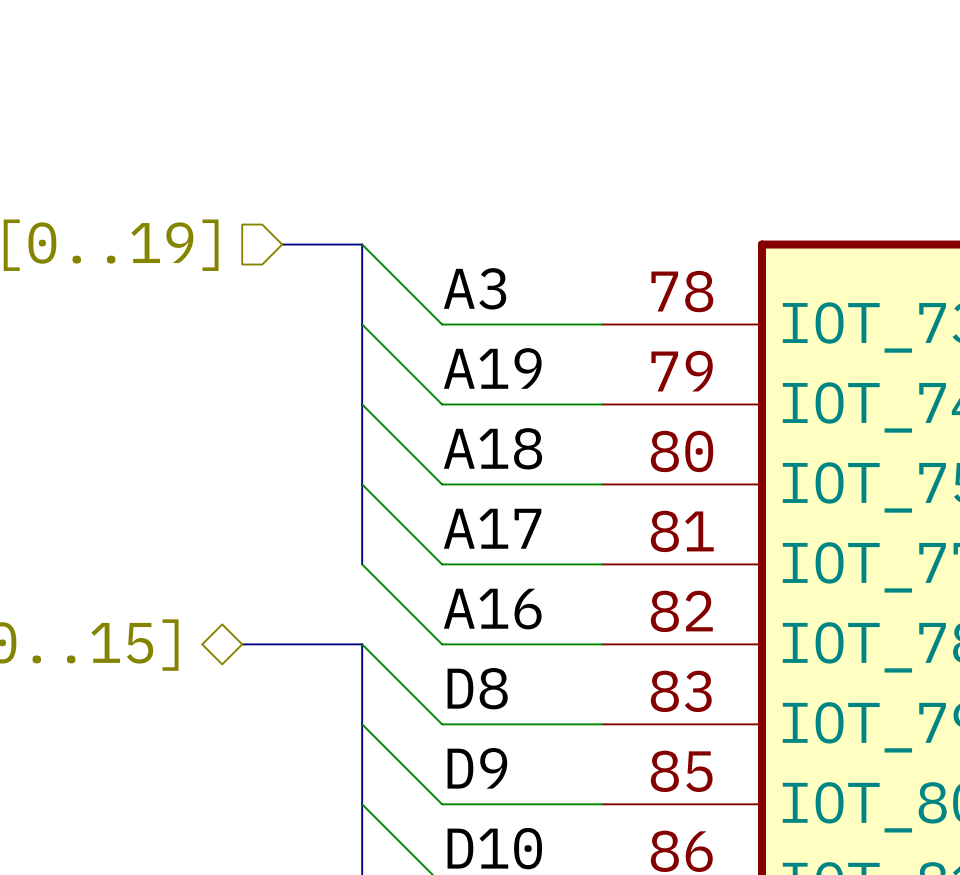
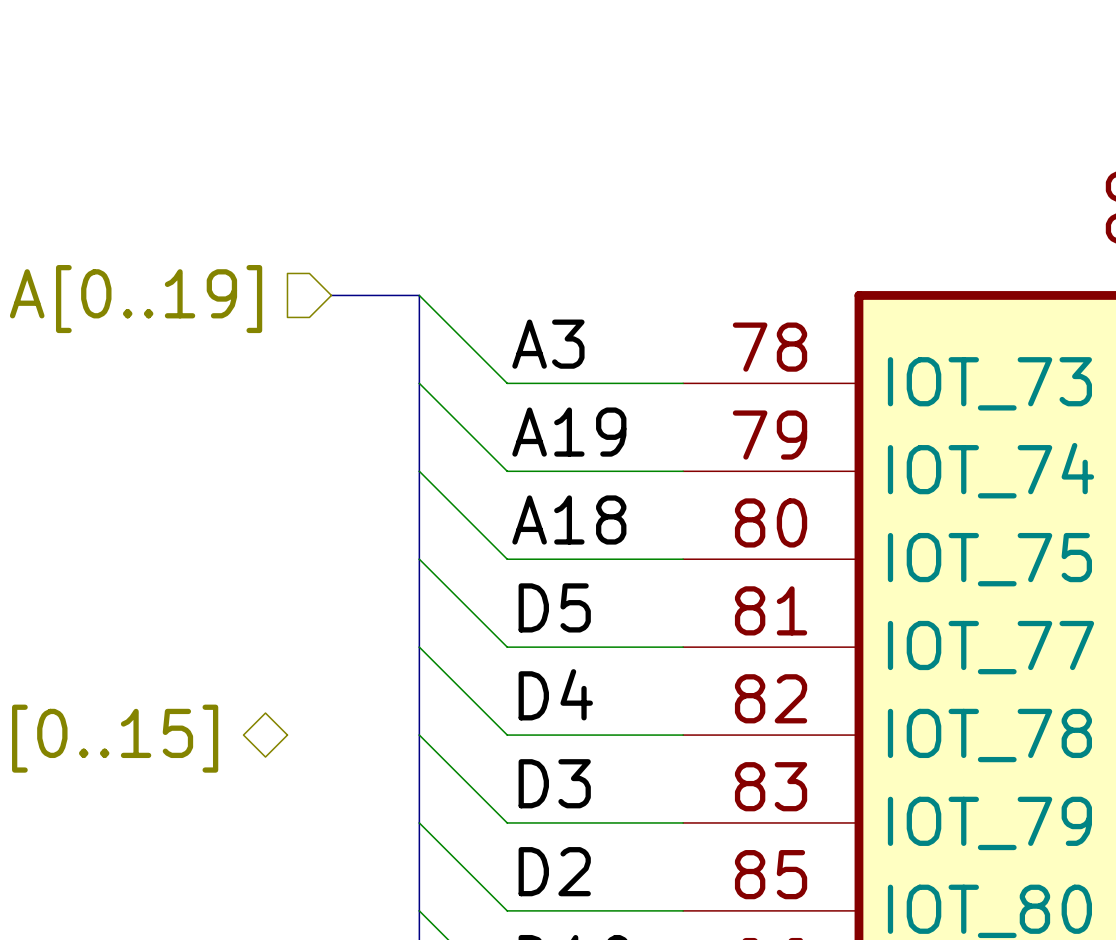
label: A17 (492, 528) -> D5 (554, 607)
label: A16 (492, 609) -> D4 (555, 694)
bus: (242, 644) (362, 644) -> (419, 647) (419, 735)
label: D8 (477, 688) -> D3 (554, 783)
label: D9 (477, 768) -> D2 (554, 871)

